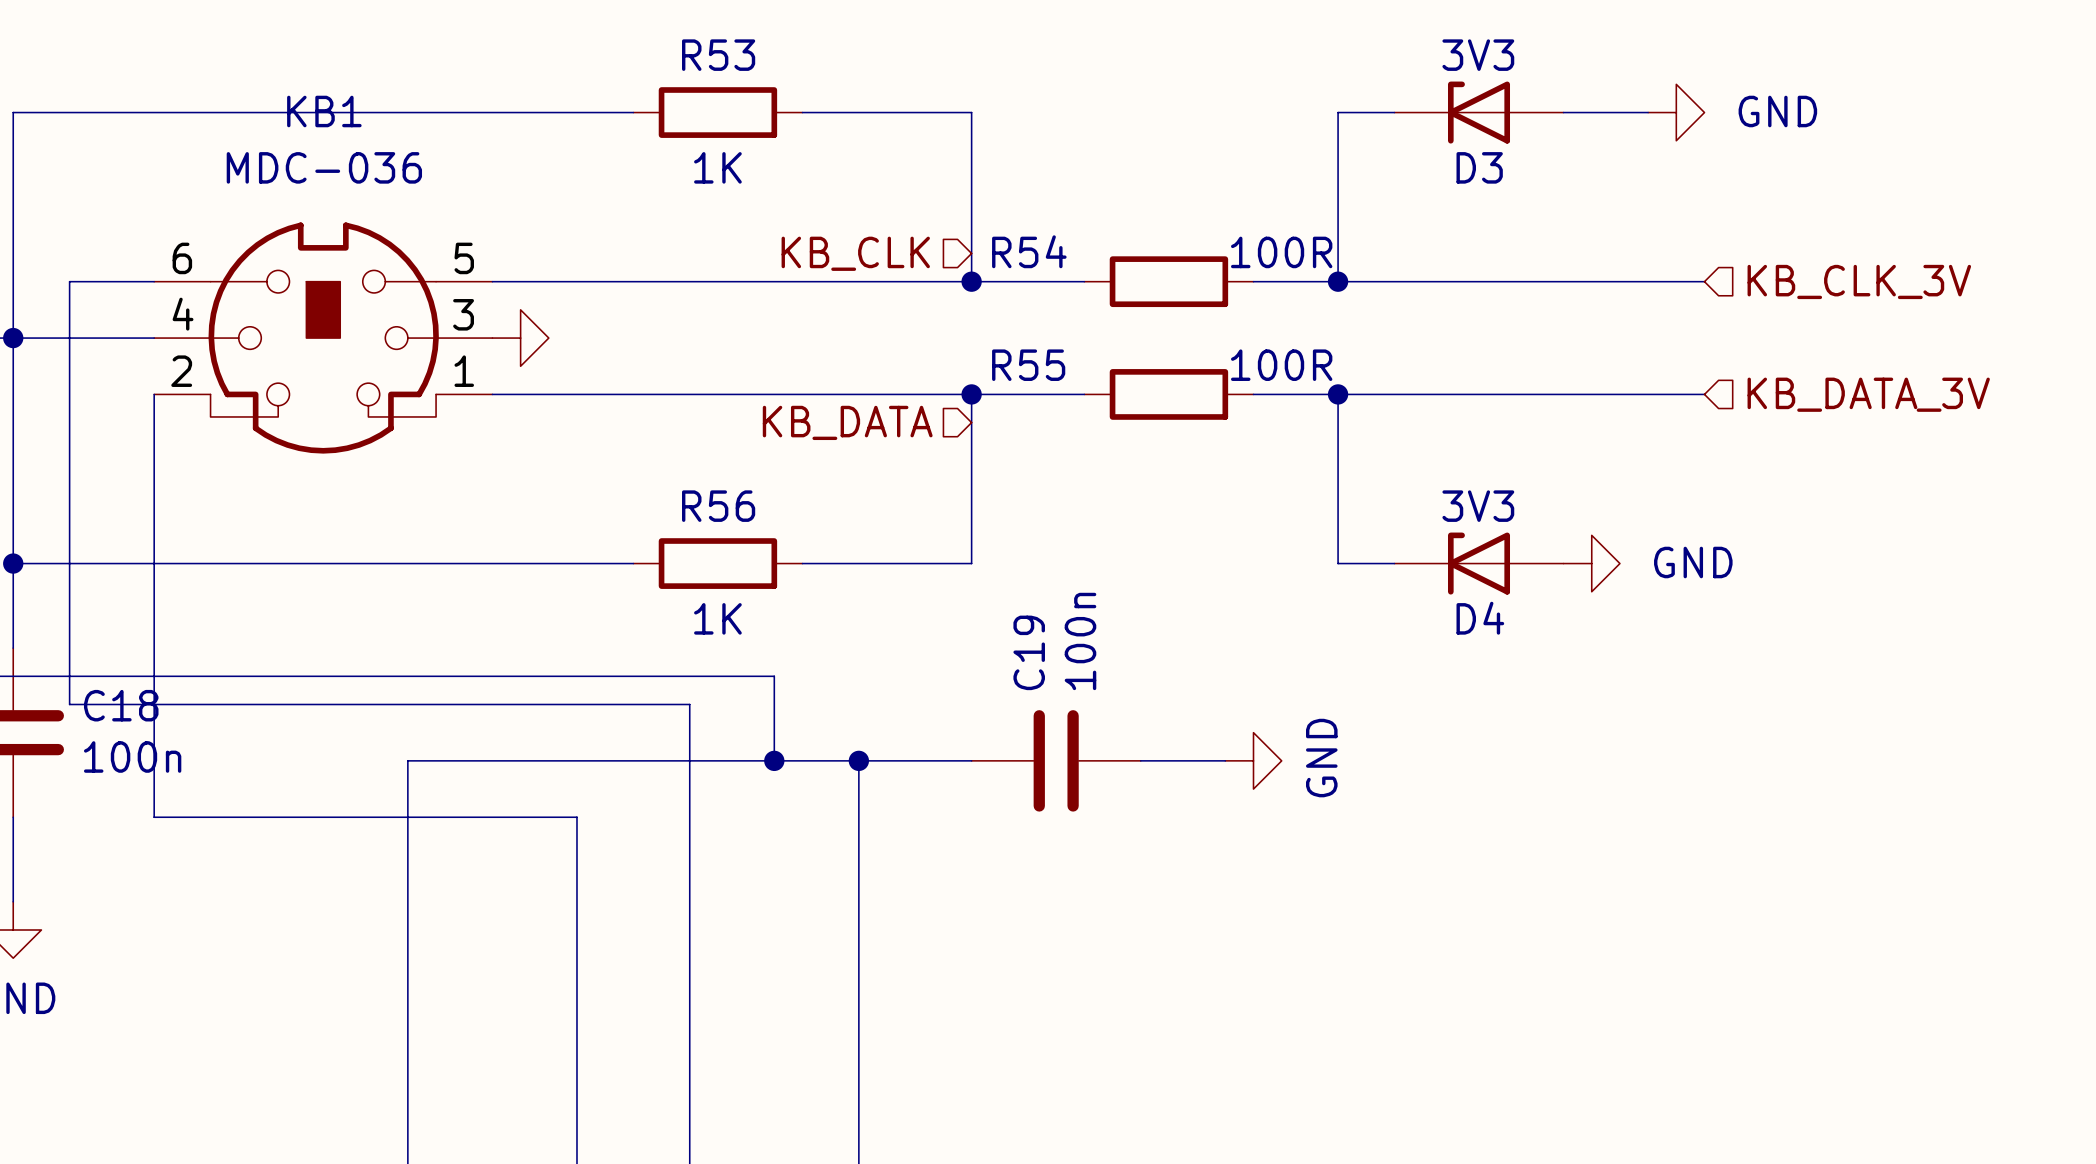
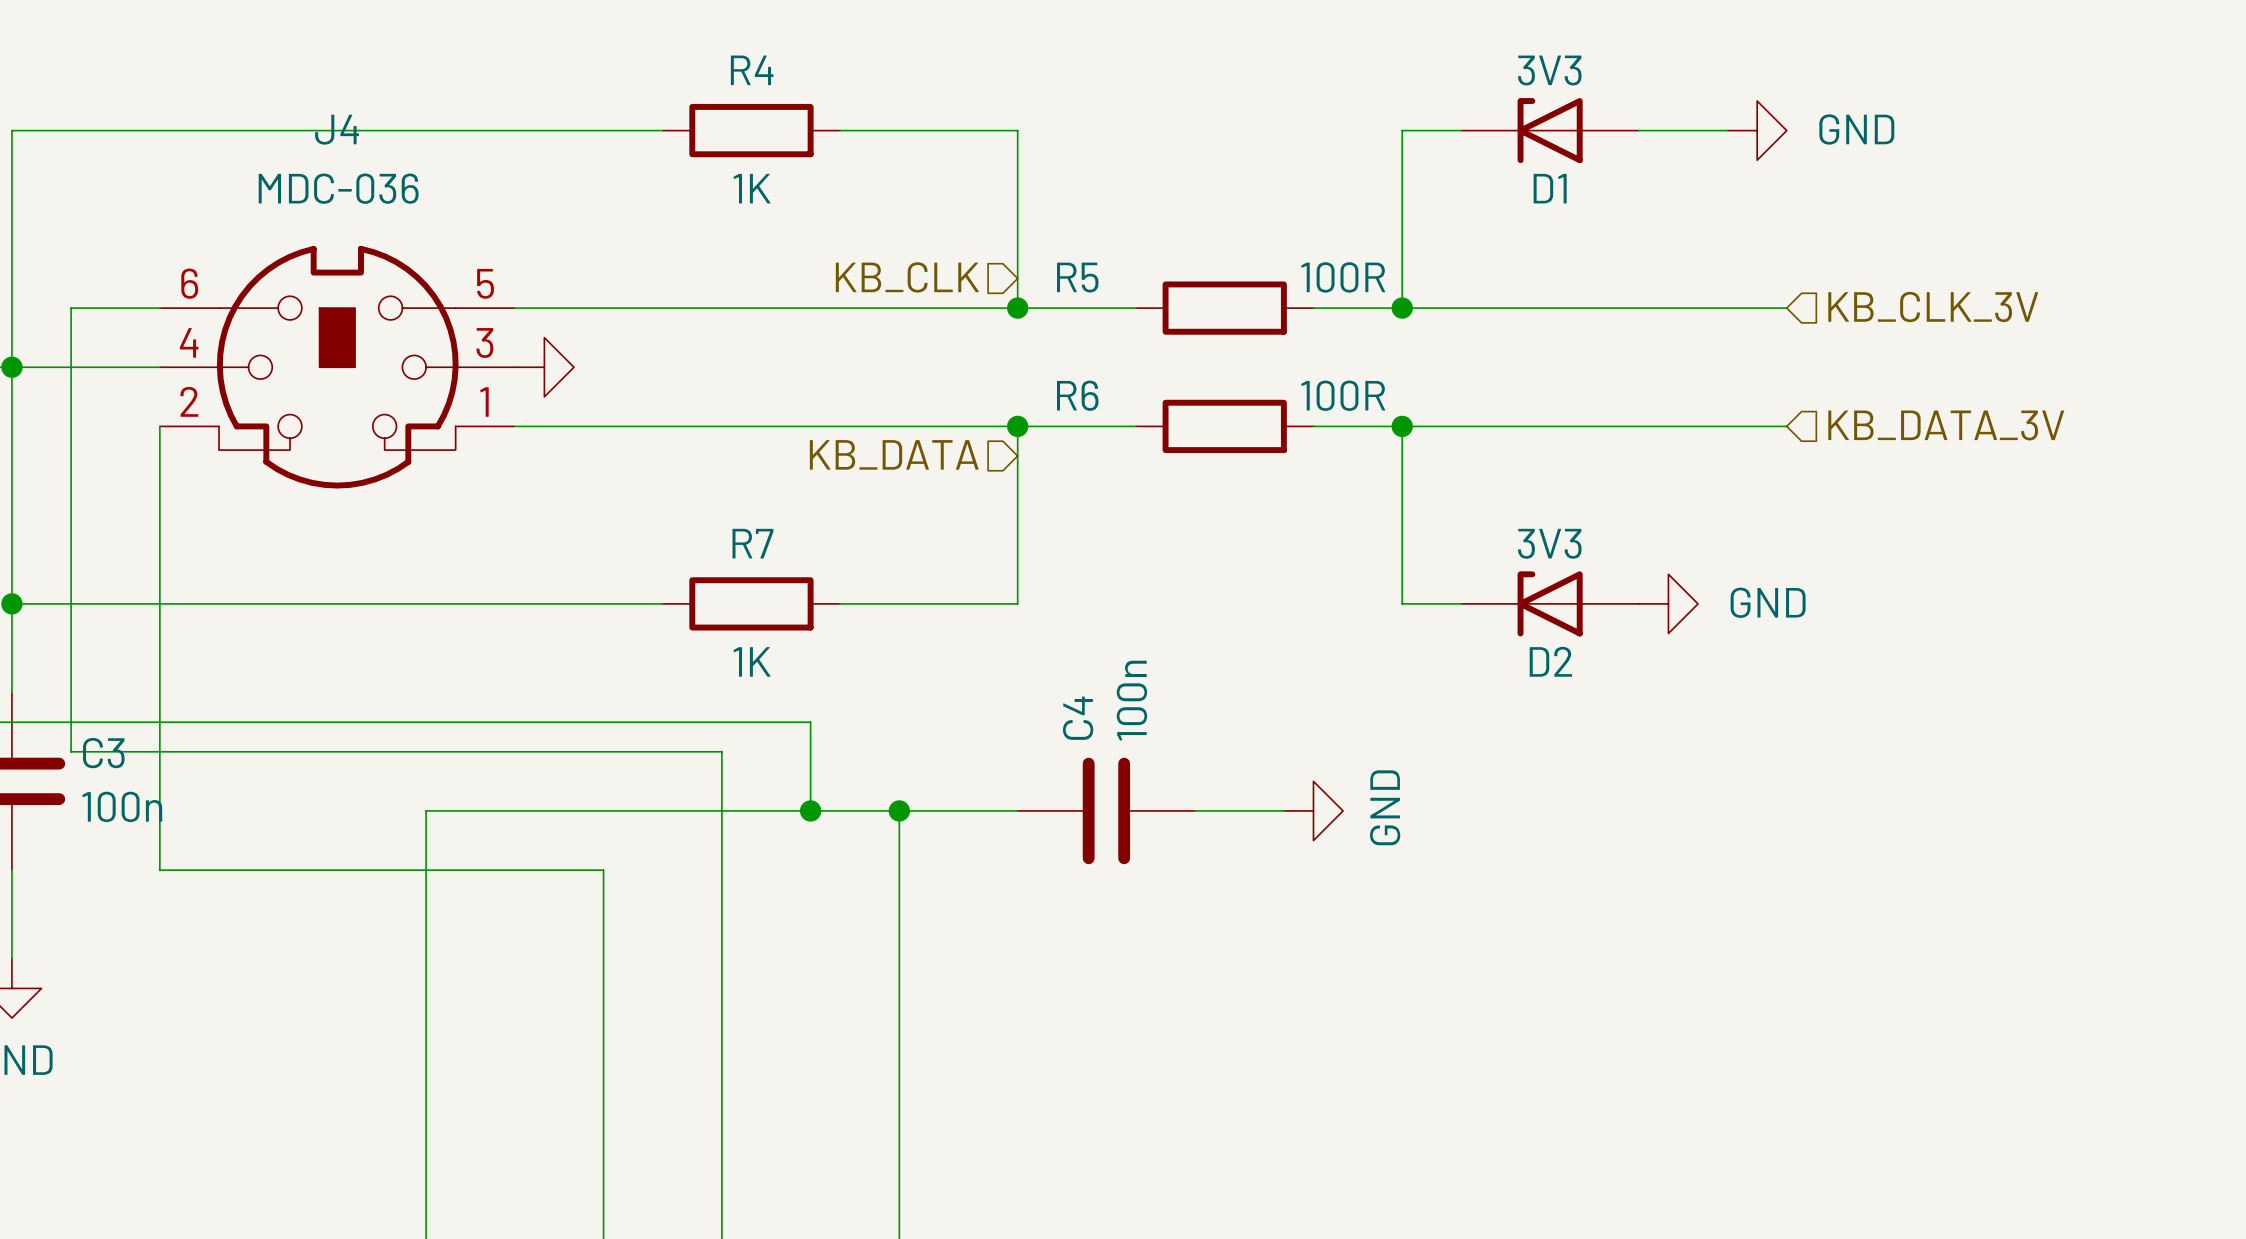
R53 name: R53 (718, 55) -> R4 (752, 70)
KB1 name: KB1 (324, 111) -> J4 (337, 129)
D3 name: D3 (1479, 167) -> D1 (1550, 188)
R54 name: R54 (1029, 251) -> R5 (1077, 277)
R55 name: R55 (1028, 365) -> R6 (1077, 395)
R56 name: R56 (718, 506) -> R7 (752, 543)
D4 name: D4 (1480, 618) -> D2 (1550, 661)
C19 name: C19 (1029, 652) -> C4 (1078, 718)
C18 name: C18 (121, 705) -> C3 (103, 753)

